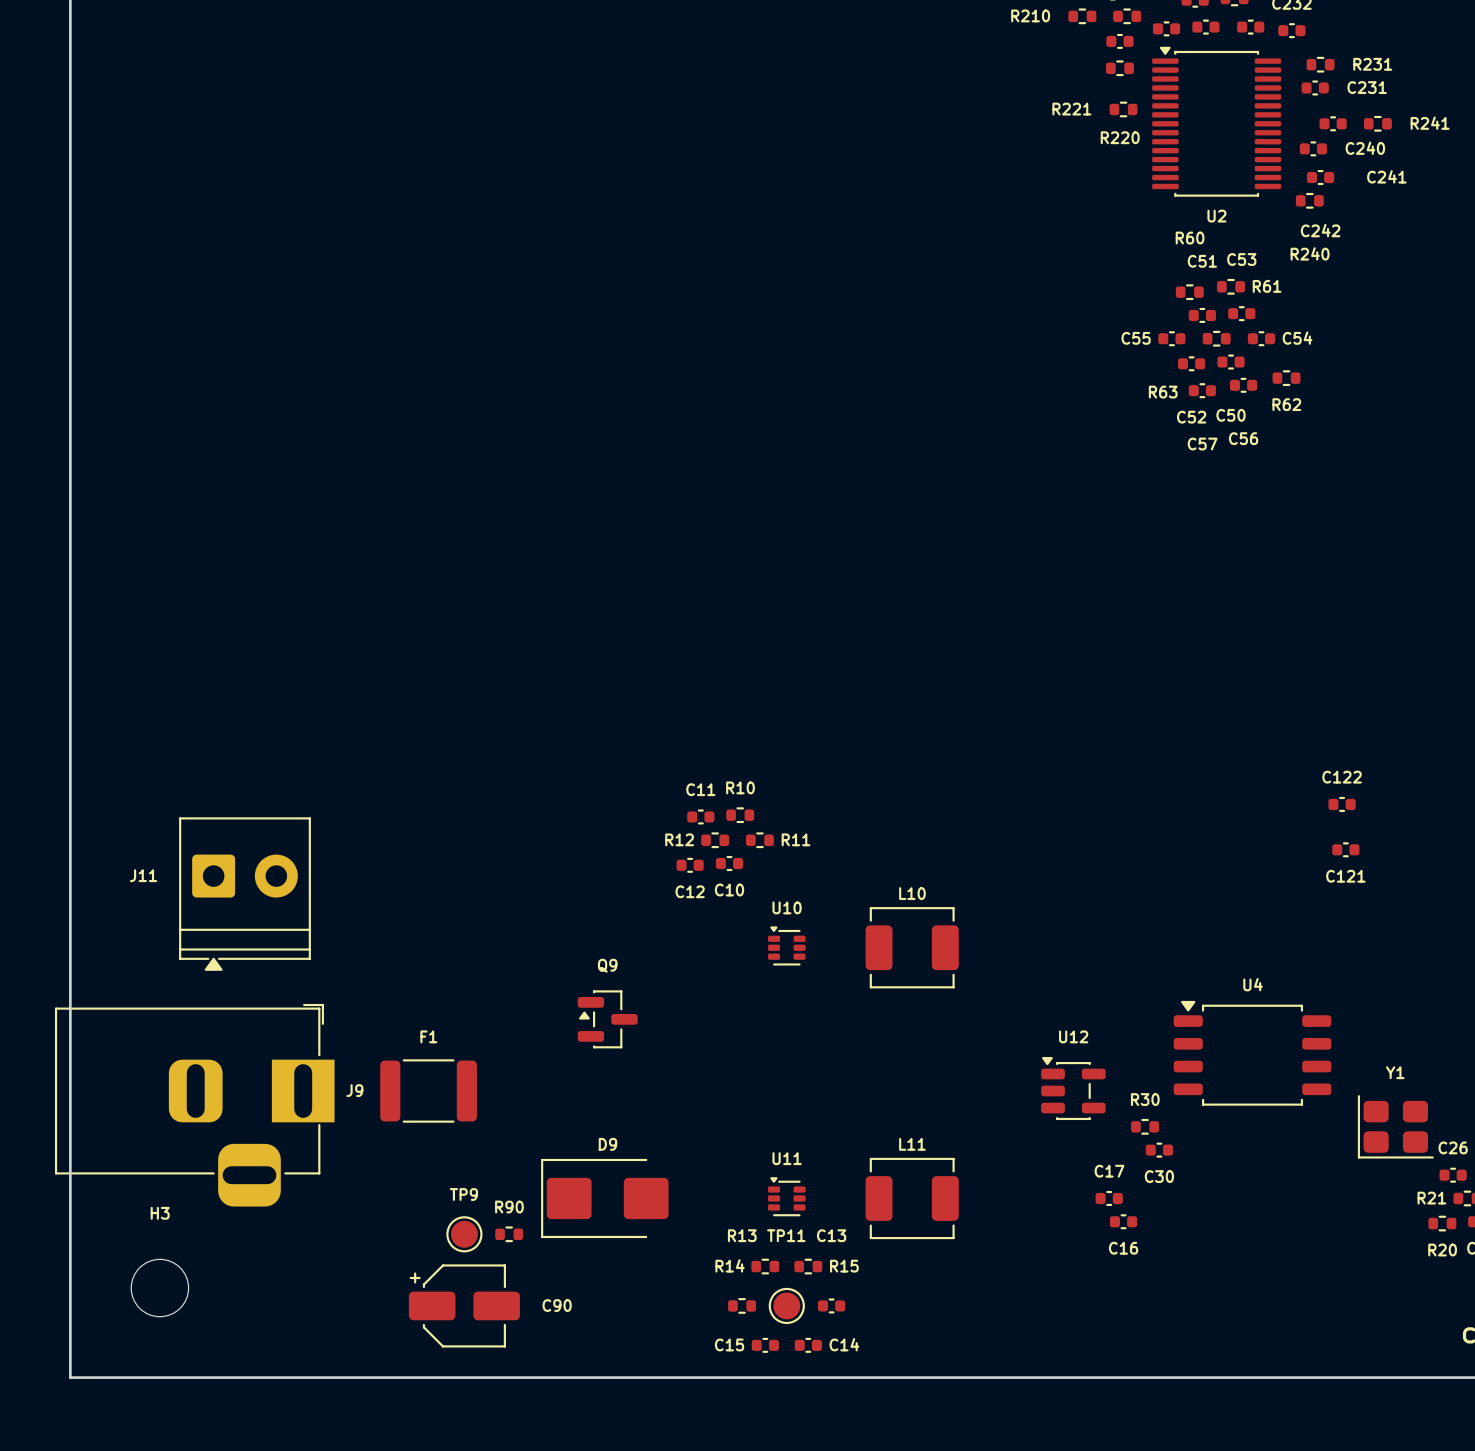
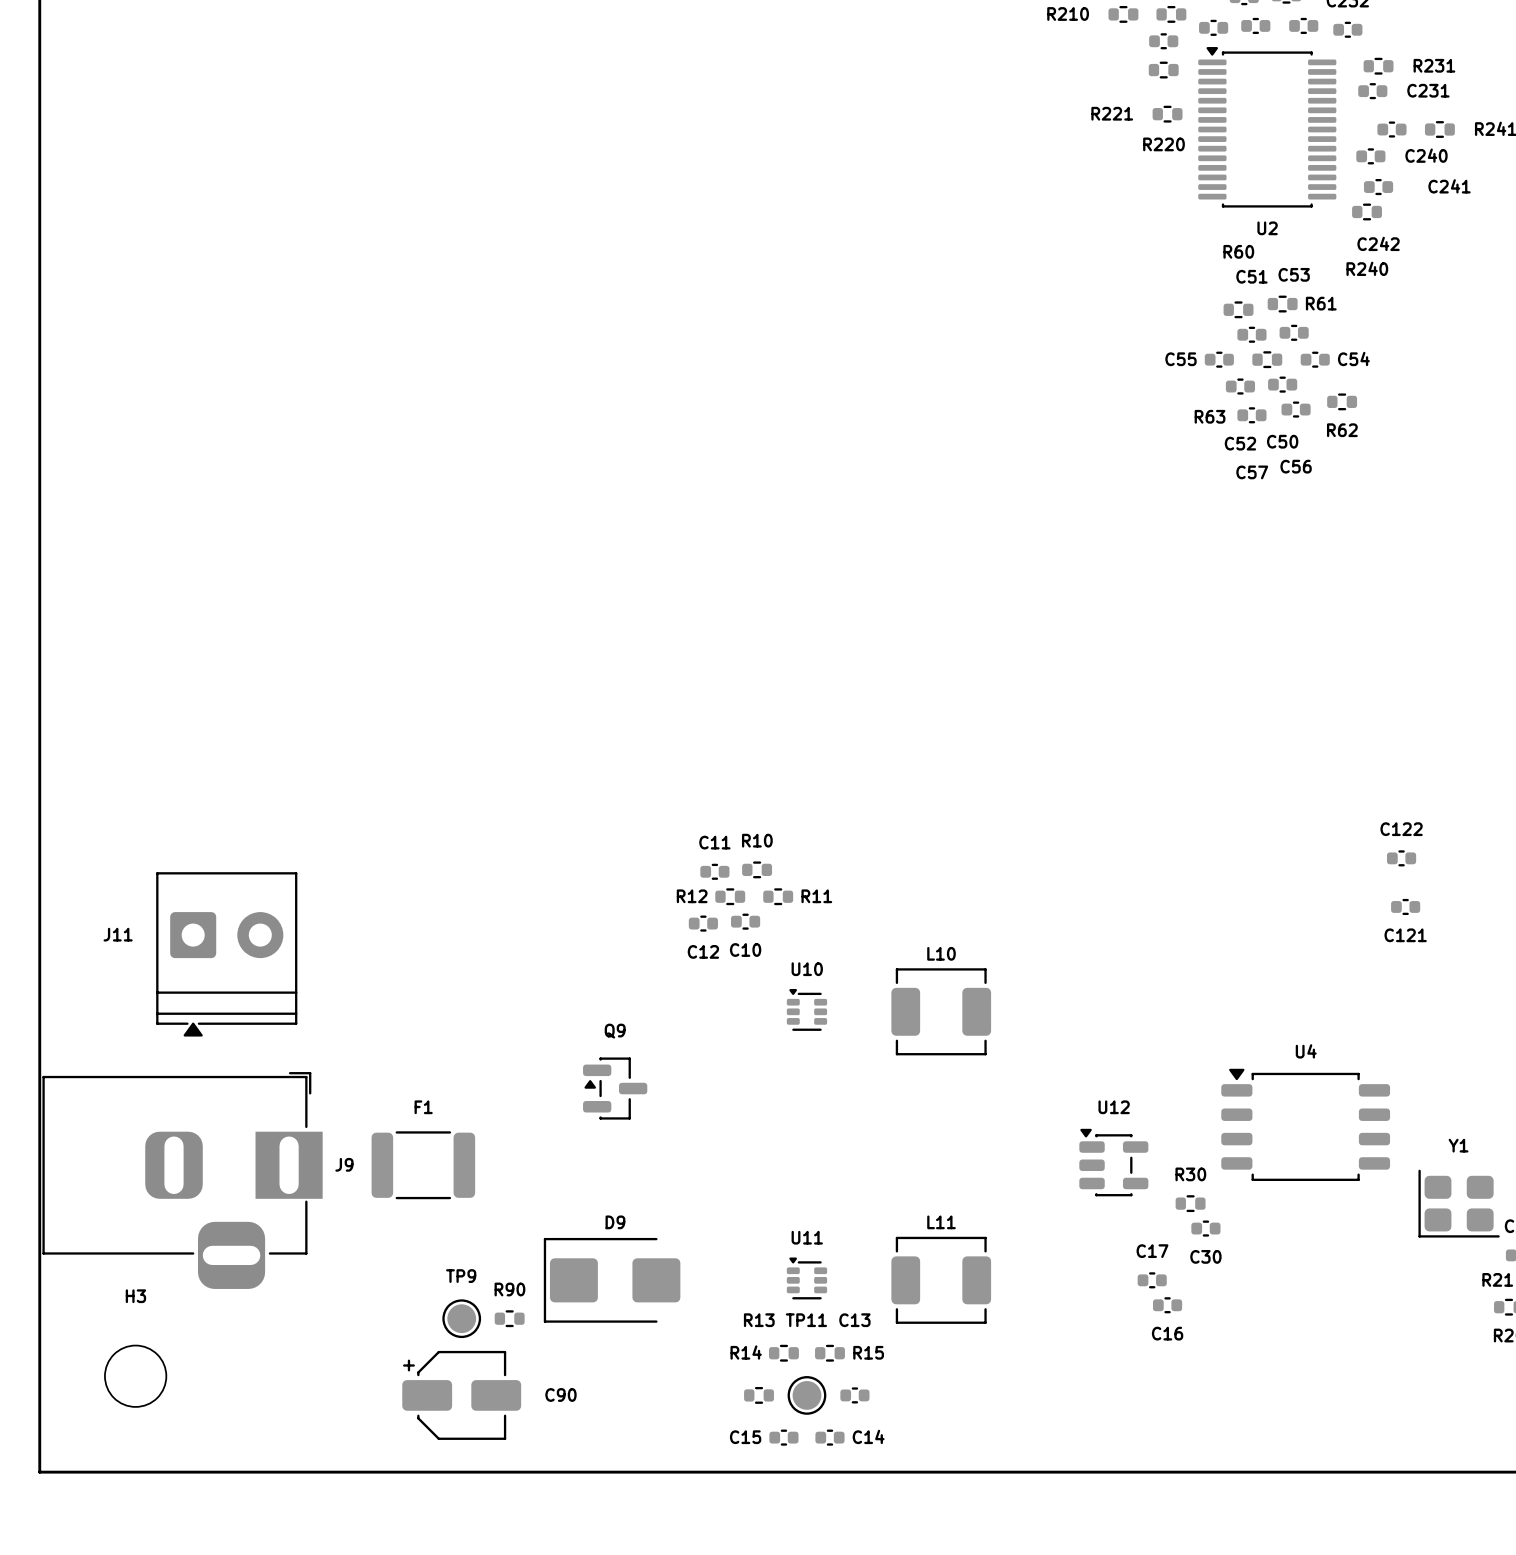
J9 footprint: [54, 1003, 335, 1207] -> [42, 1072, 323, 1289]

